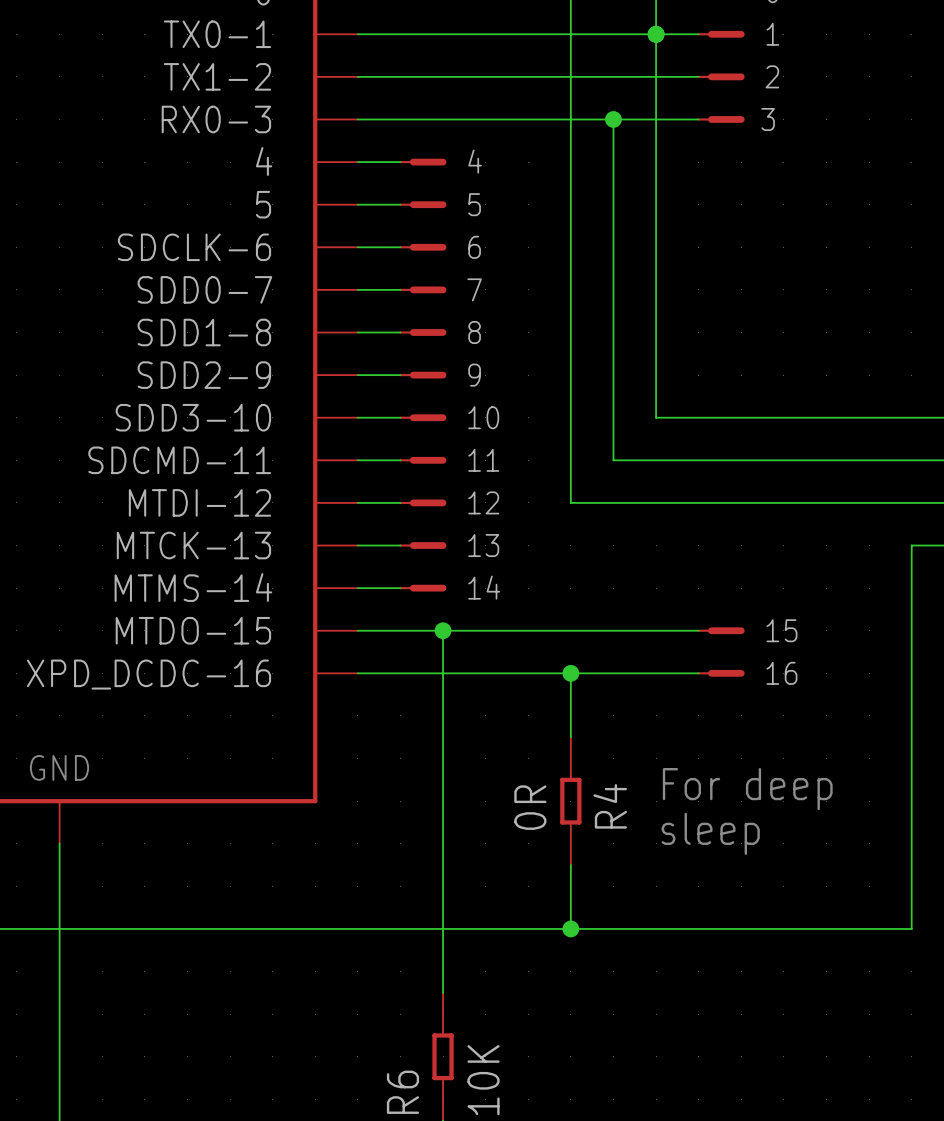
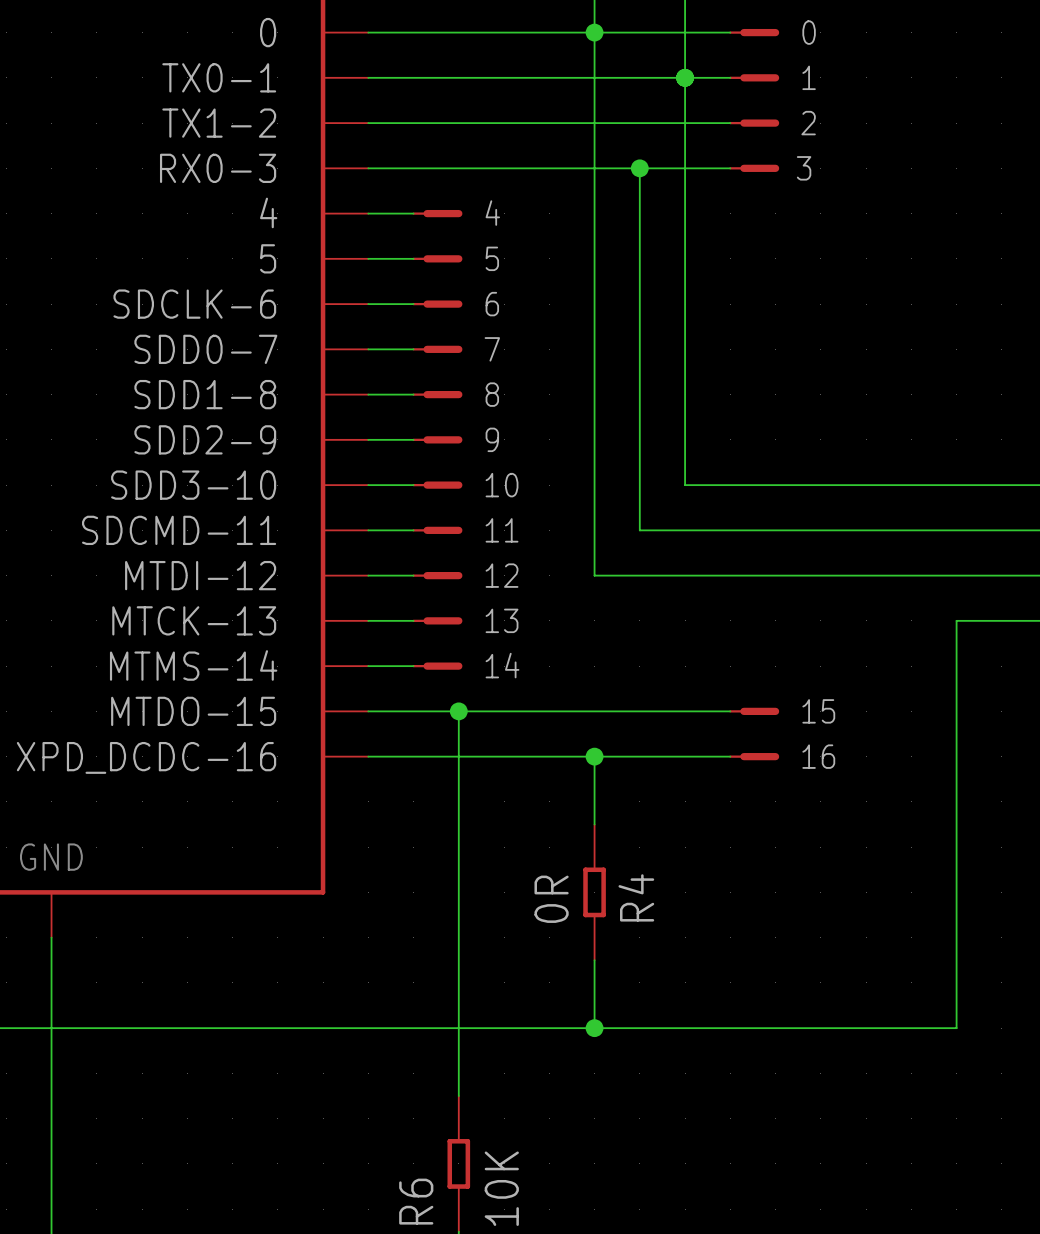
text: For deep (747, 789) -> none
text: sleep (710, 833) -> none

